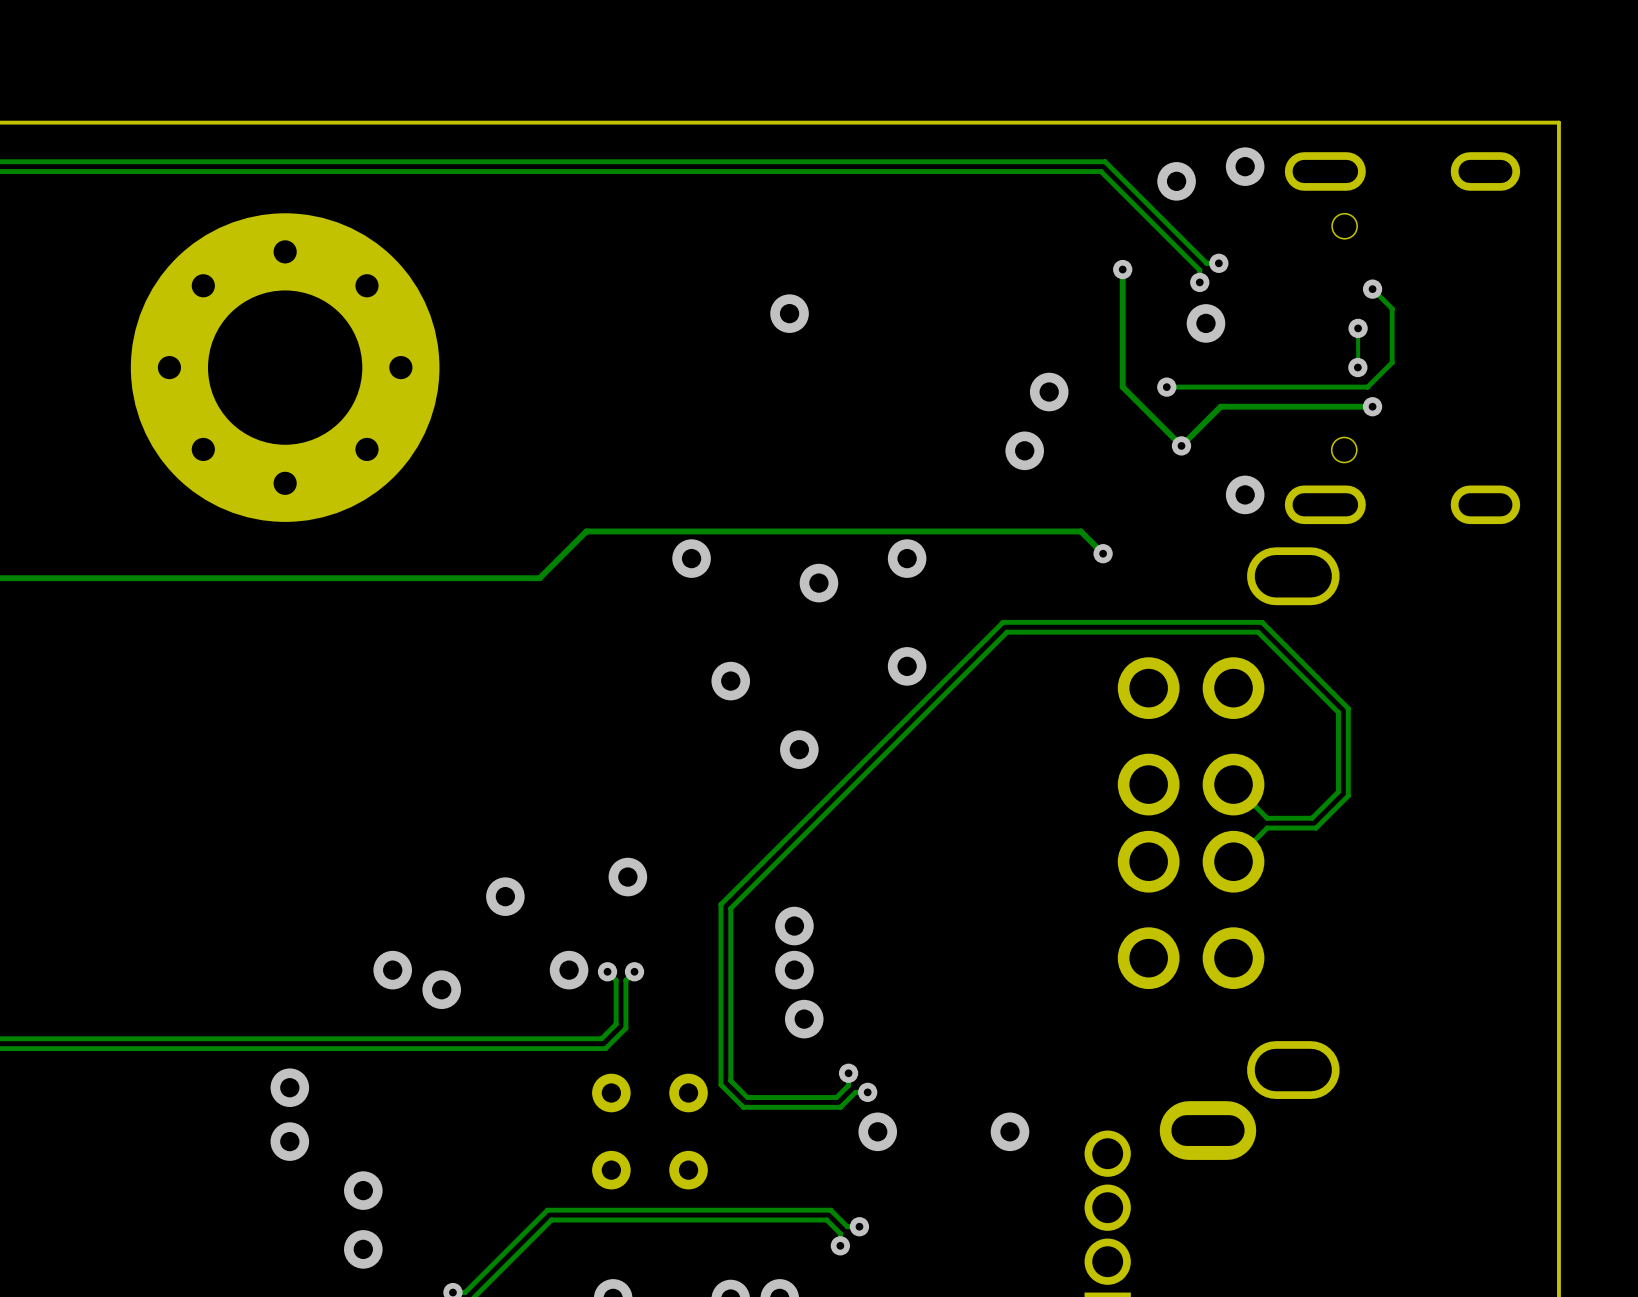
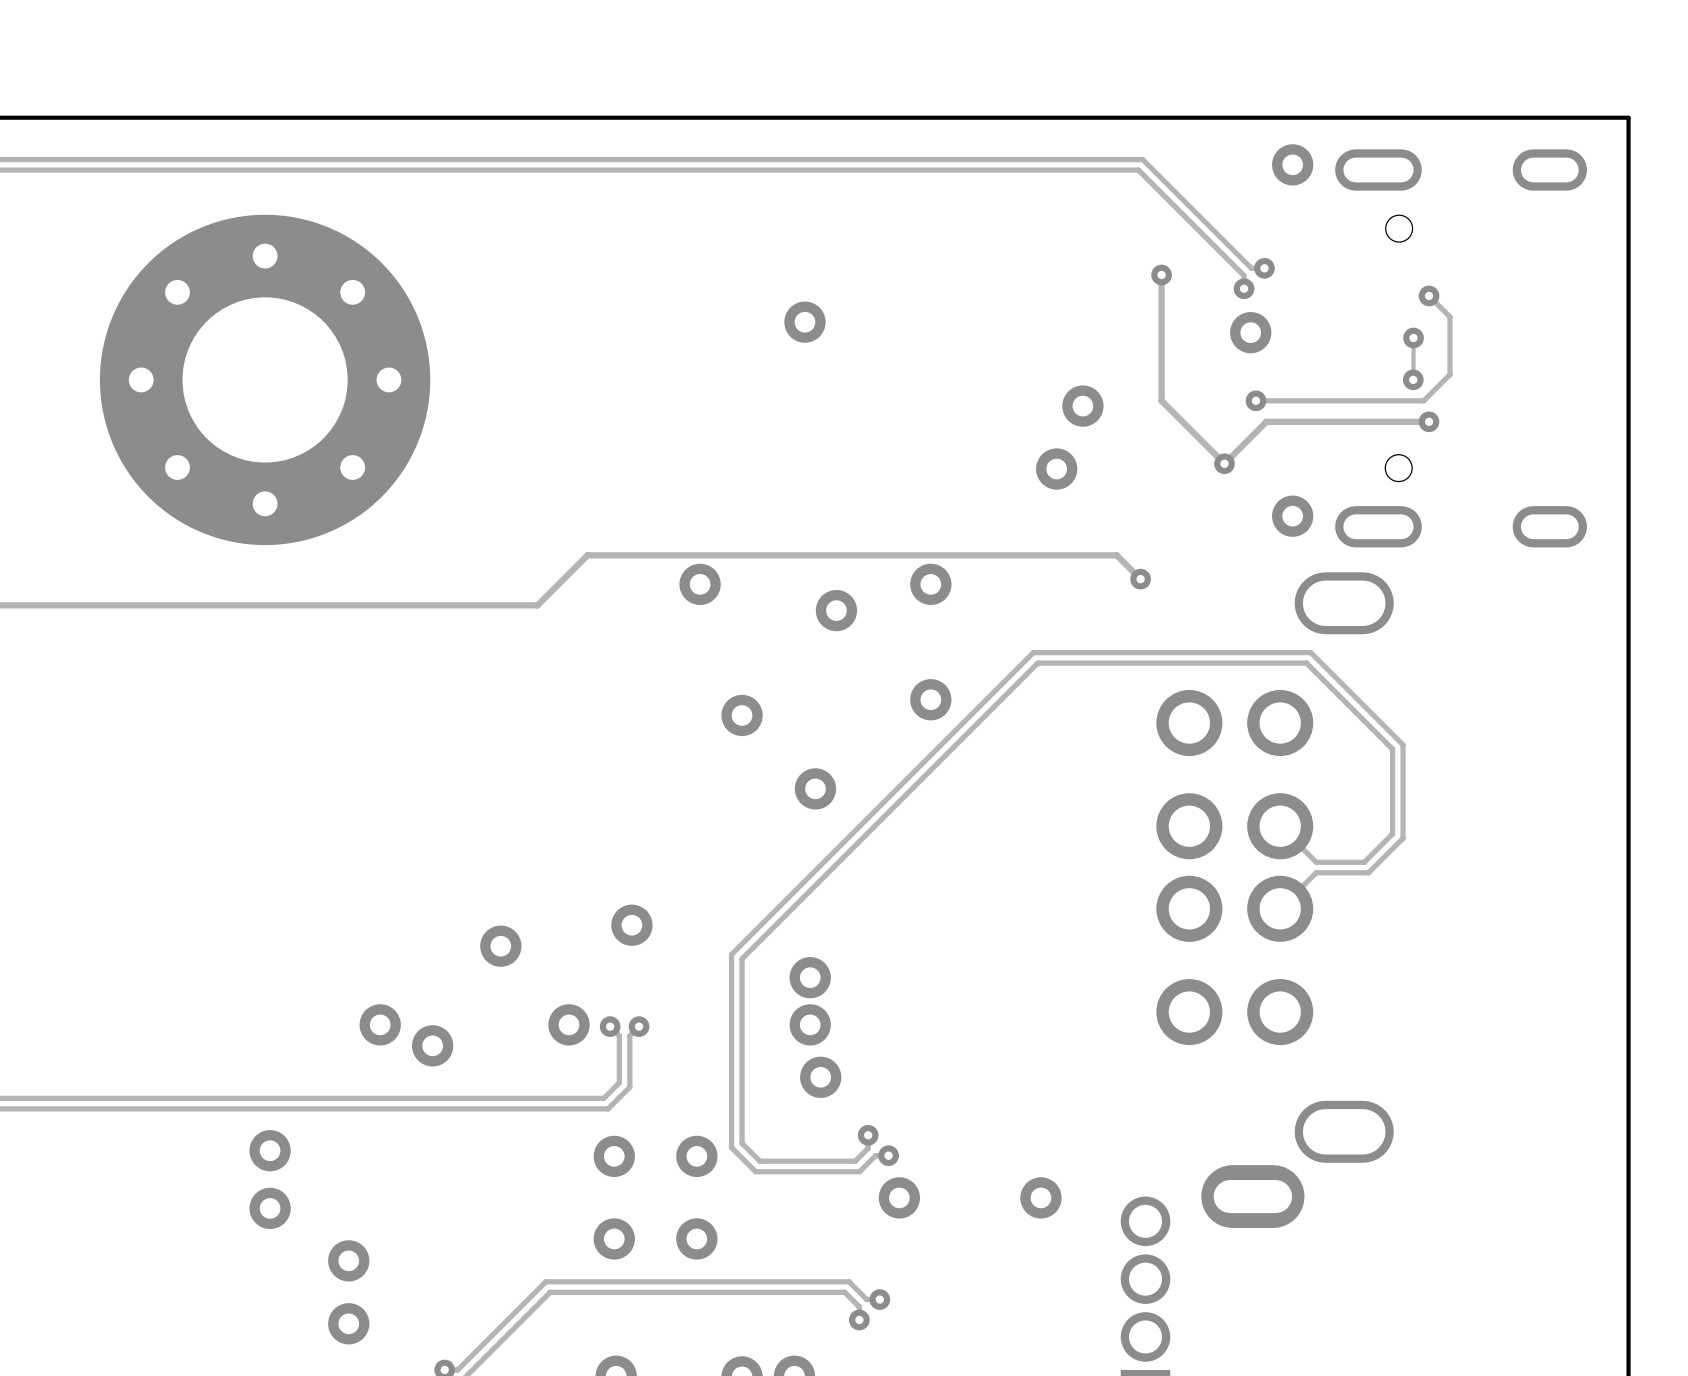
via: (1176, 181) -> none
via position: (1166, 387) -> (1255, 400)
track: (1210, 387) (1166, 387) -> none

